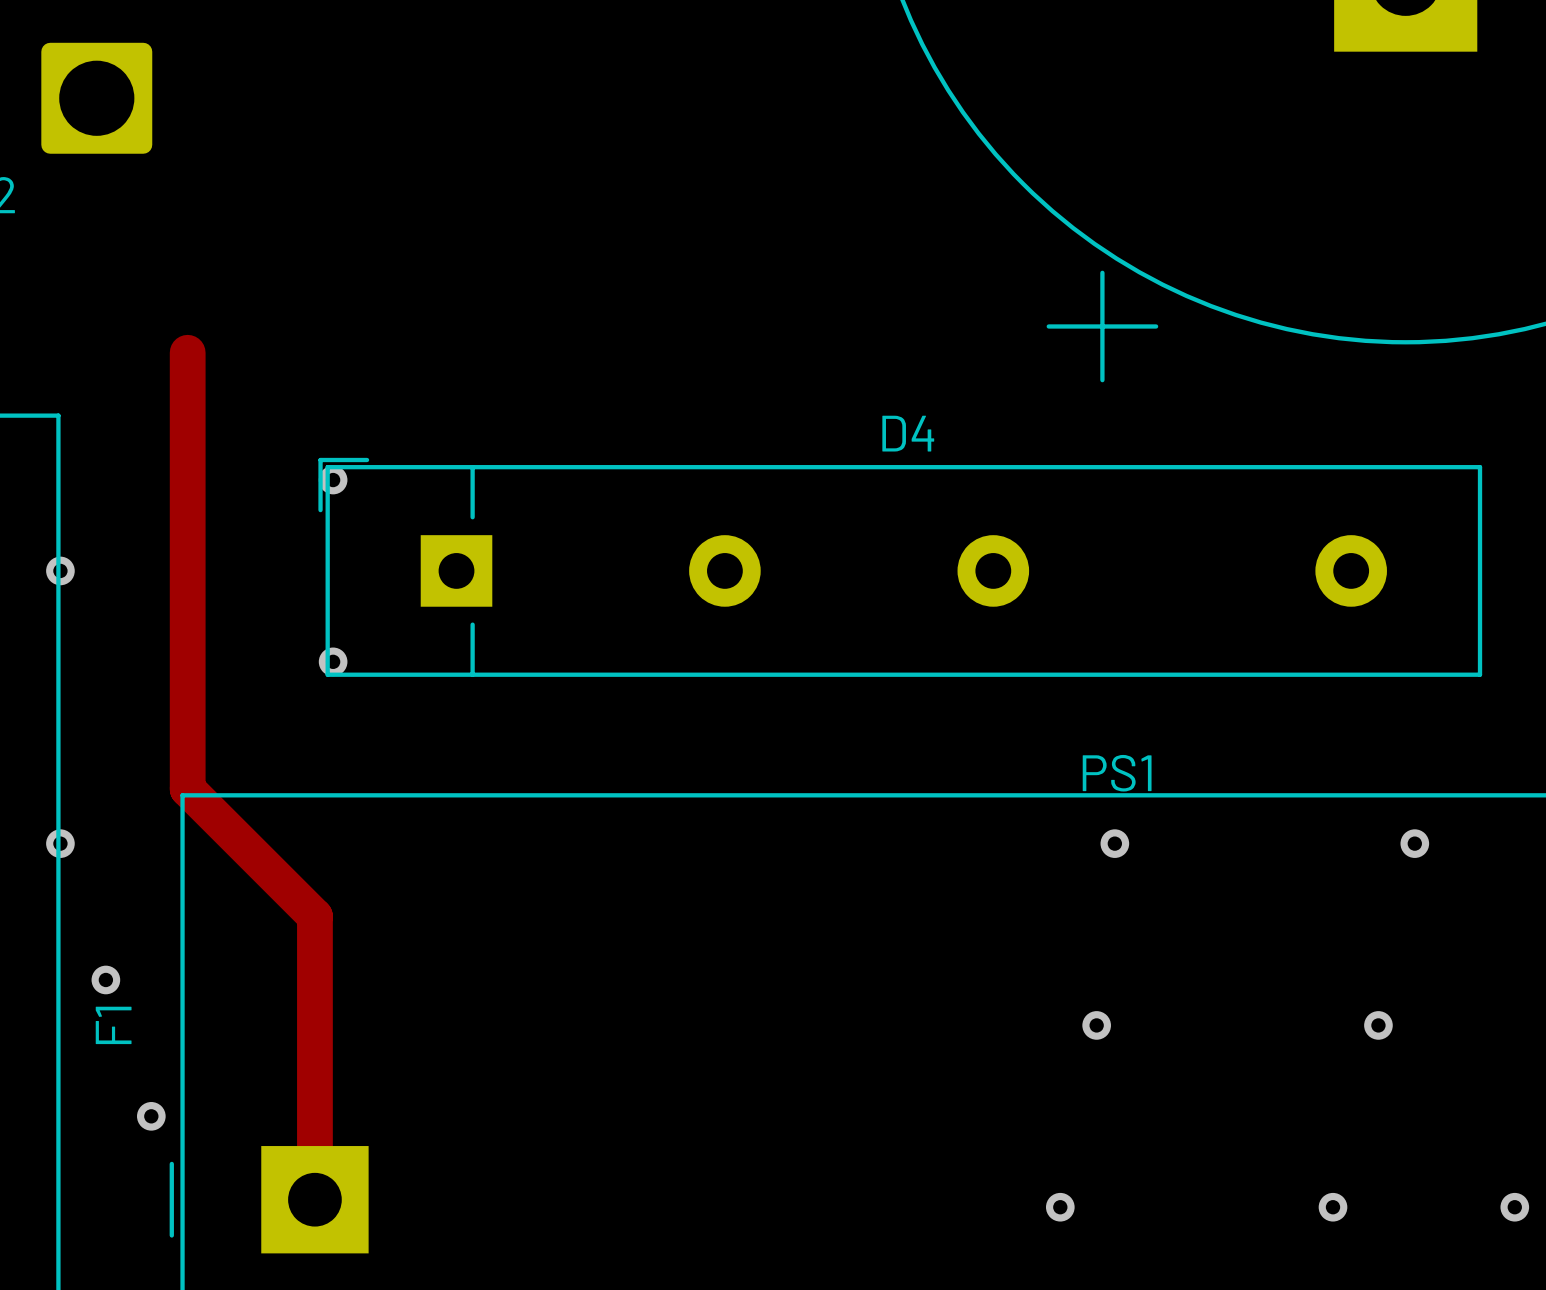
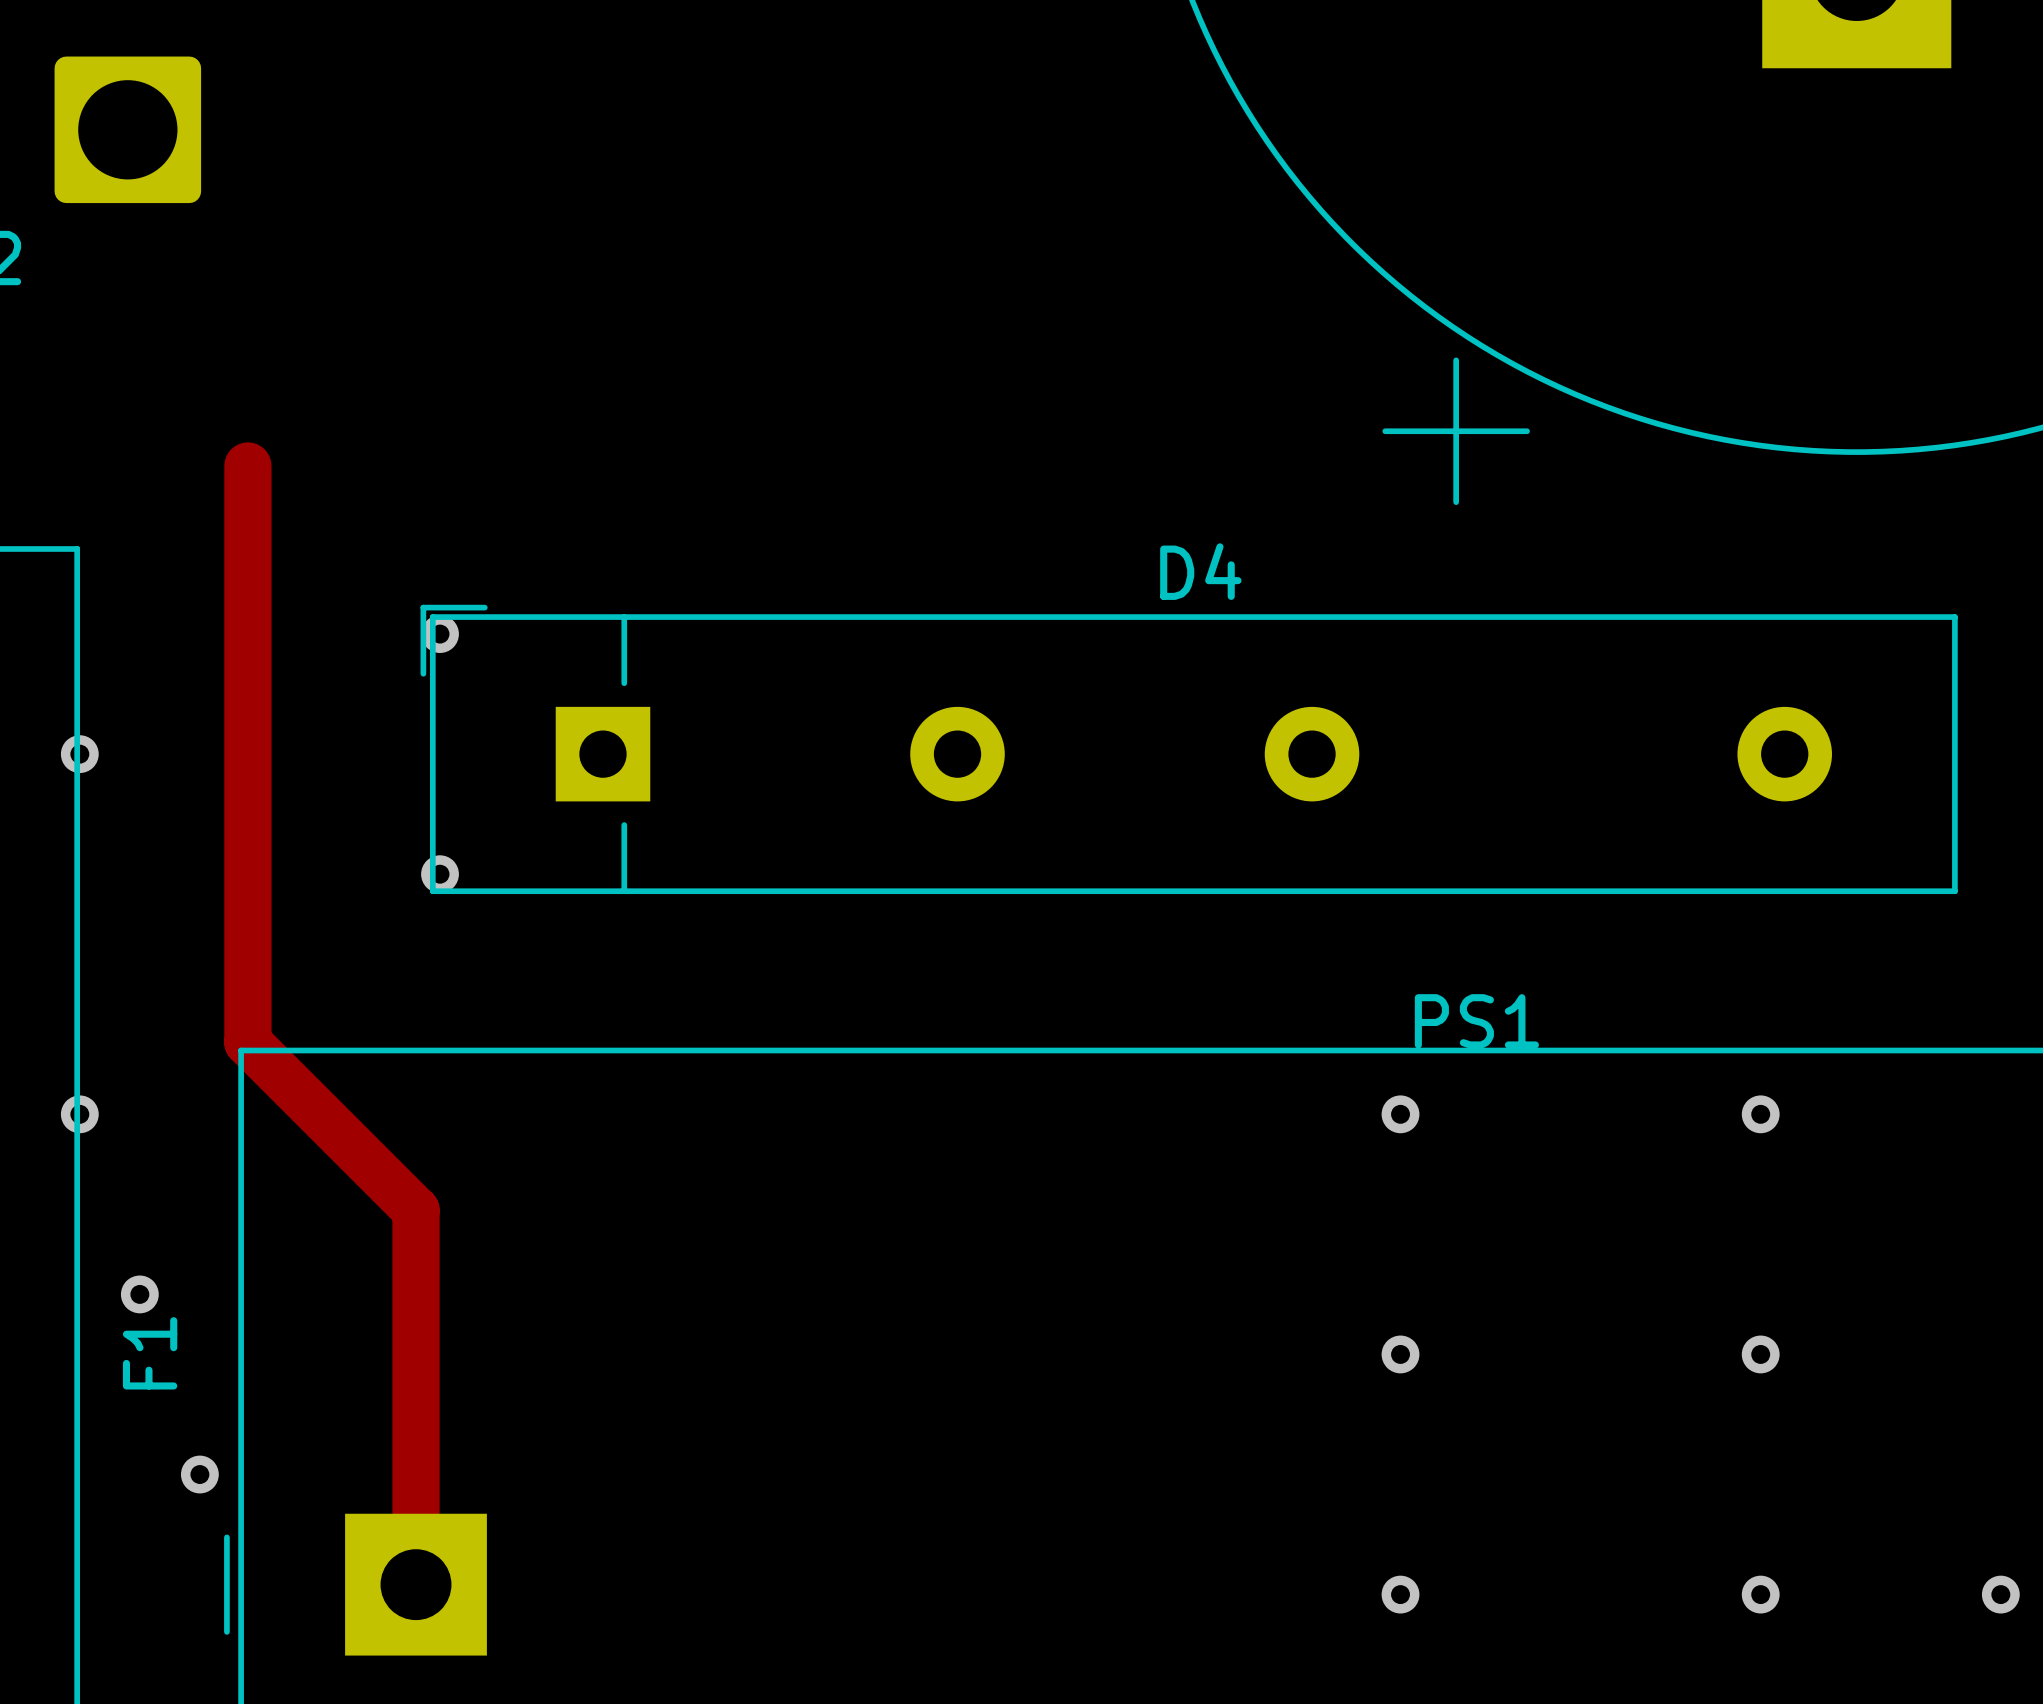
via position: (1114, 843) -> (1400, 1114)
via position: (1414, 843) -> (1760, 1114)
via position: (1096, 1025) -> (1400, 1354)
via position: (1378, 1025) -> (1760, 1354)

